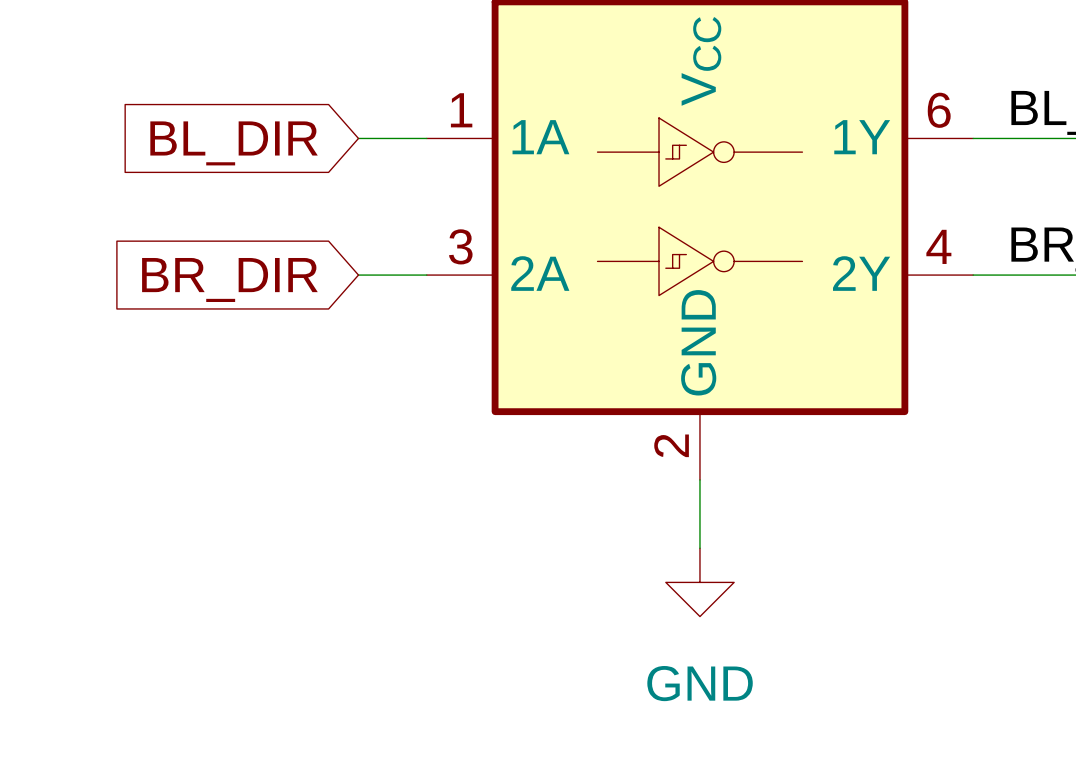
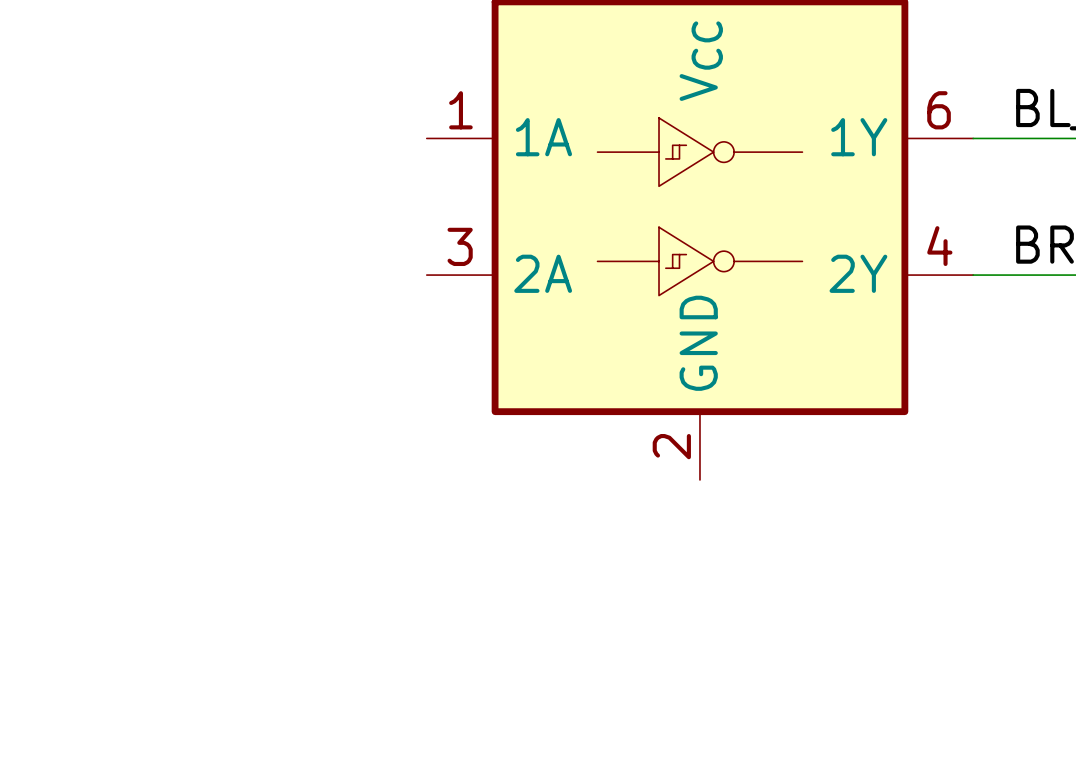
wire: (358, 138) (426, 138) -> none
global label: BL_DIR (234, 143) -> none
wire: (358, 275) (426, 275) -> none
global label: BR_DIR (229, 279) -> none
wire: (699, 479) (699, 548) -> none
power symbol: GND (699, 582) -> none

